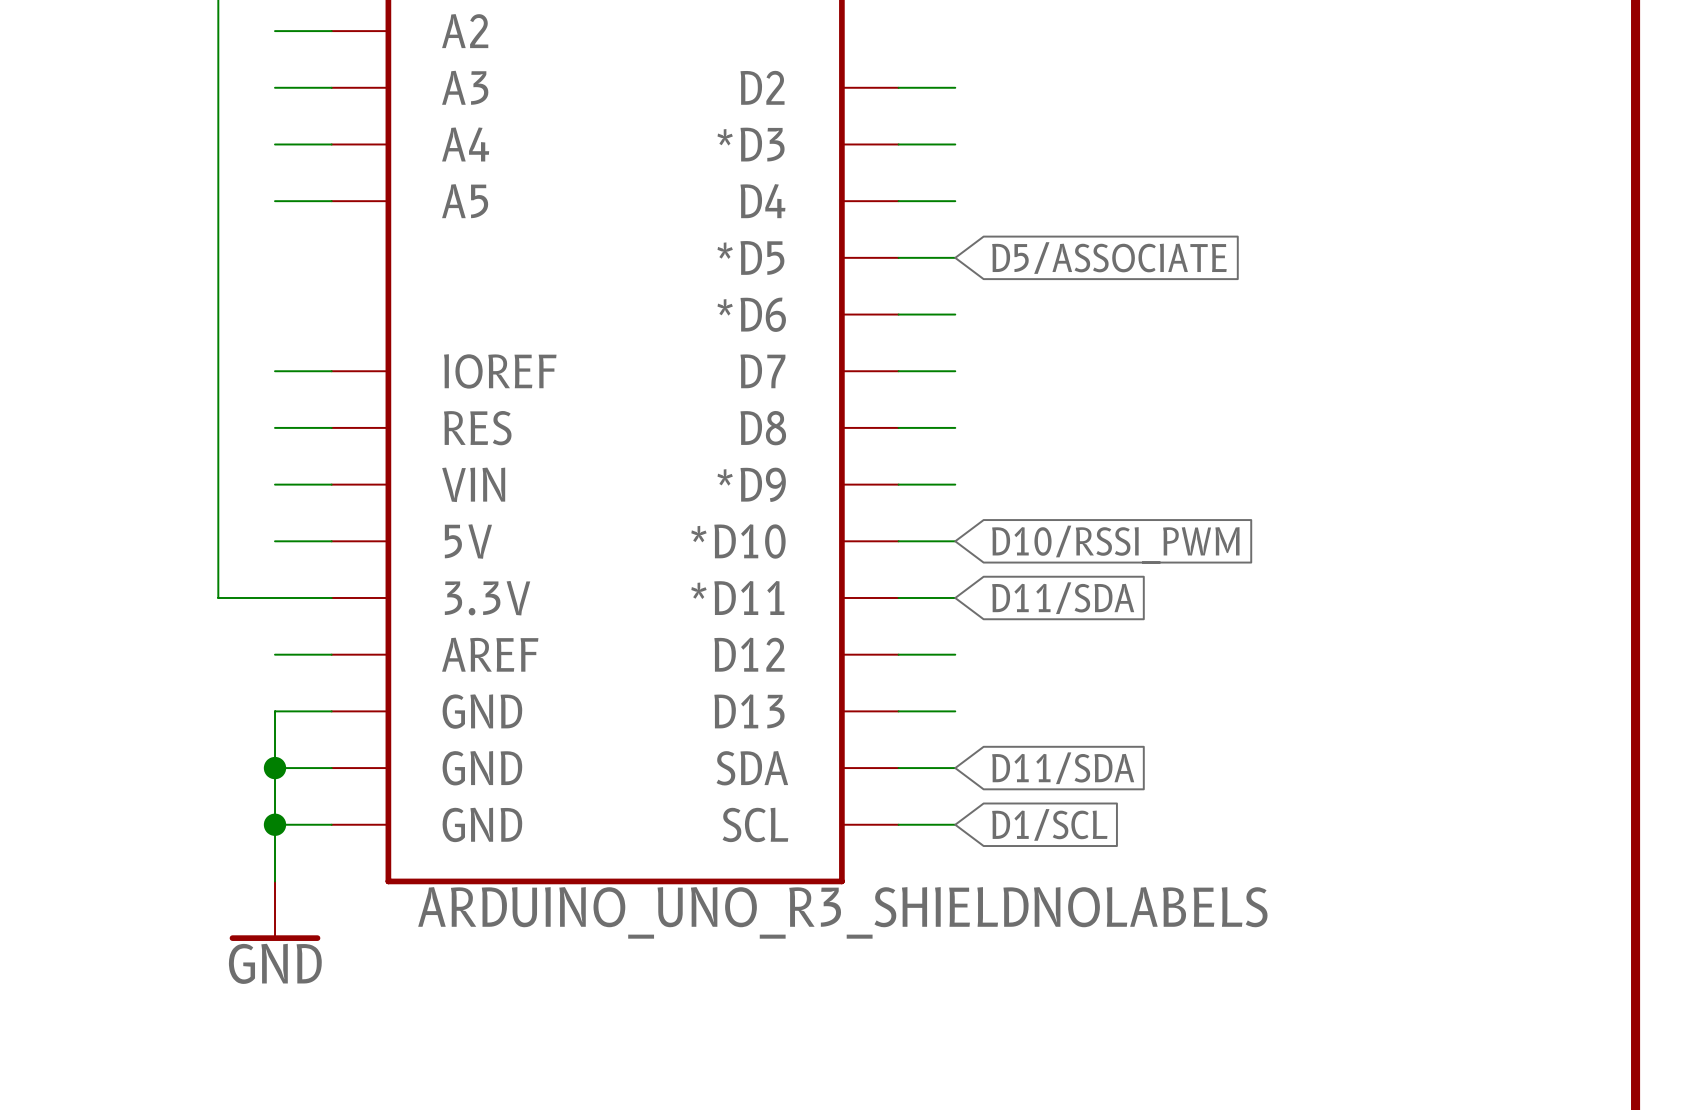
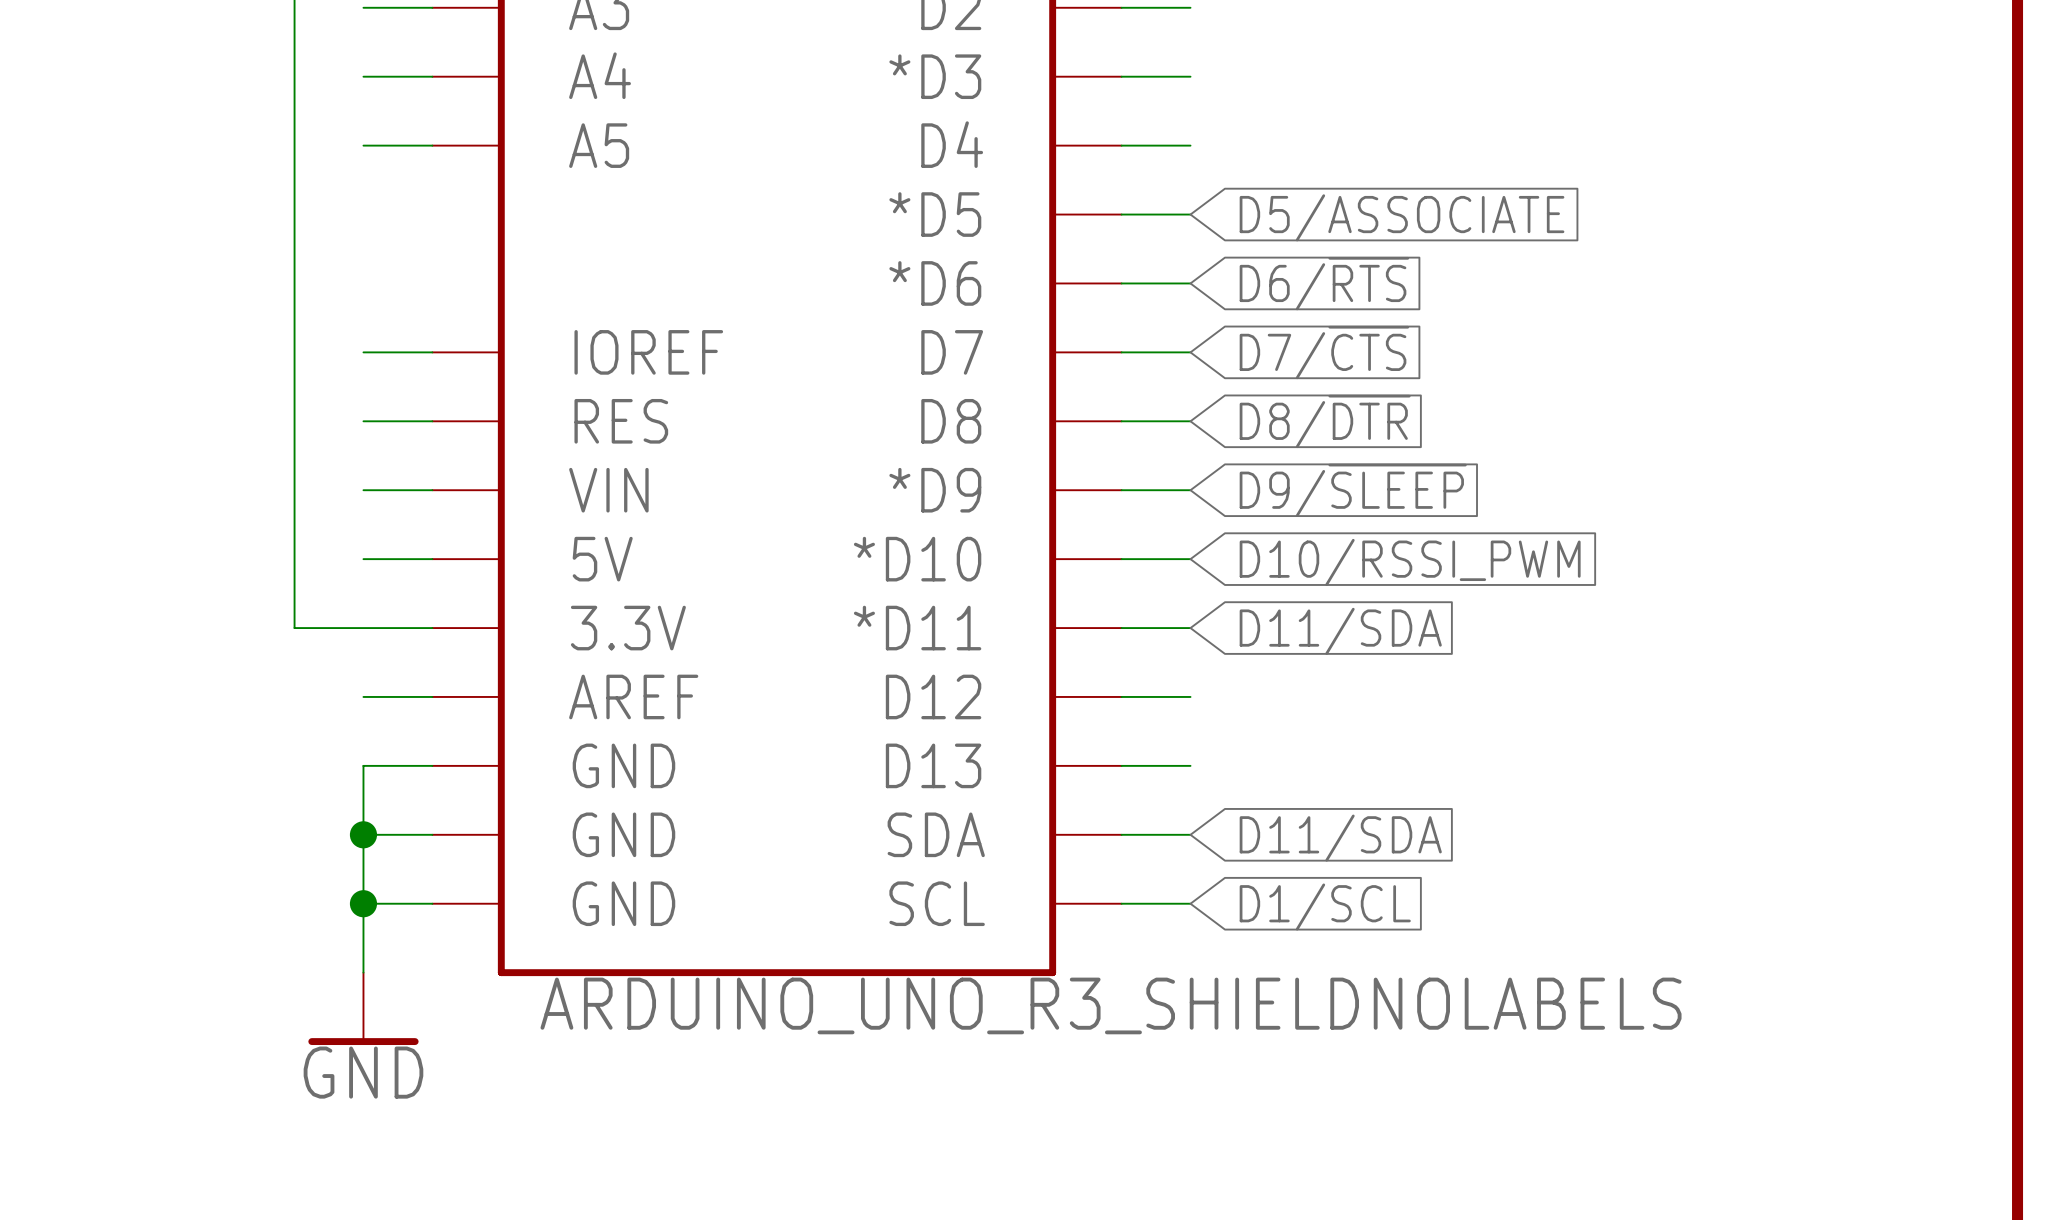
global label: none -> D6/~{RTS} (1324, 283)
global label: none -> D7/~{CTS} (1324, 352)
global label: none -> D8/~{DTR} (1325, 421)
global label: none -> D9/~{SLEEP} (1353, 490)

